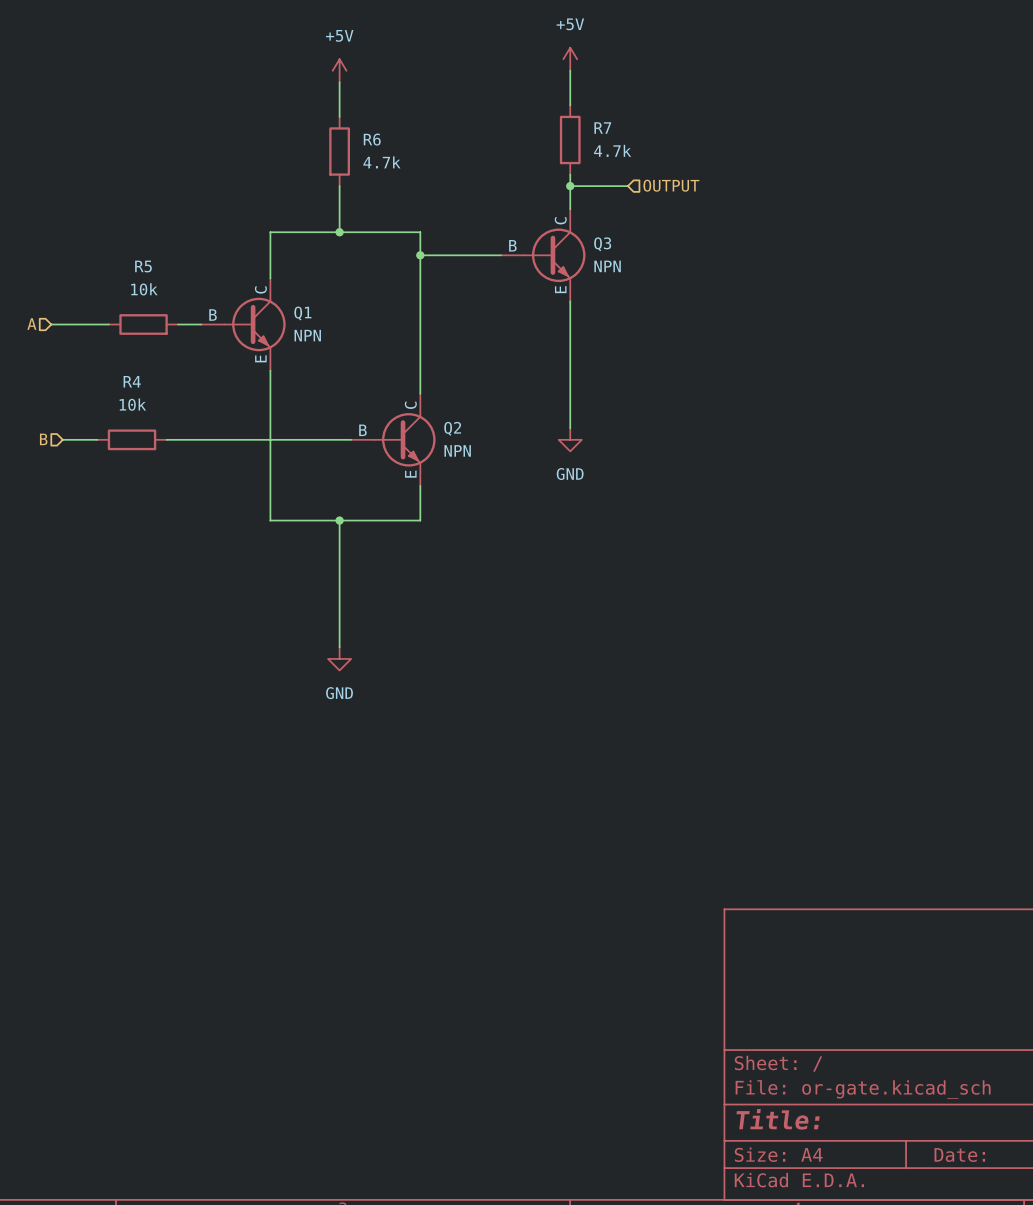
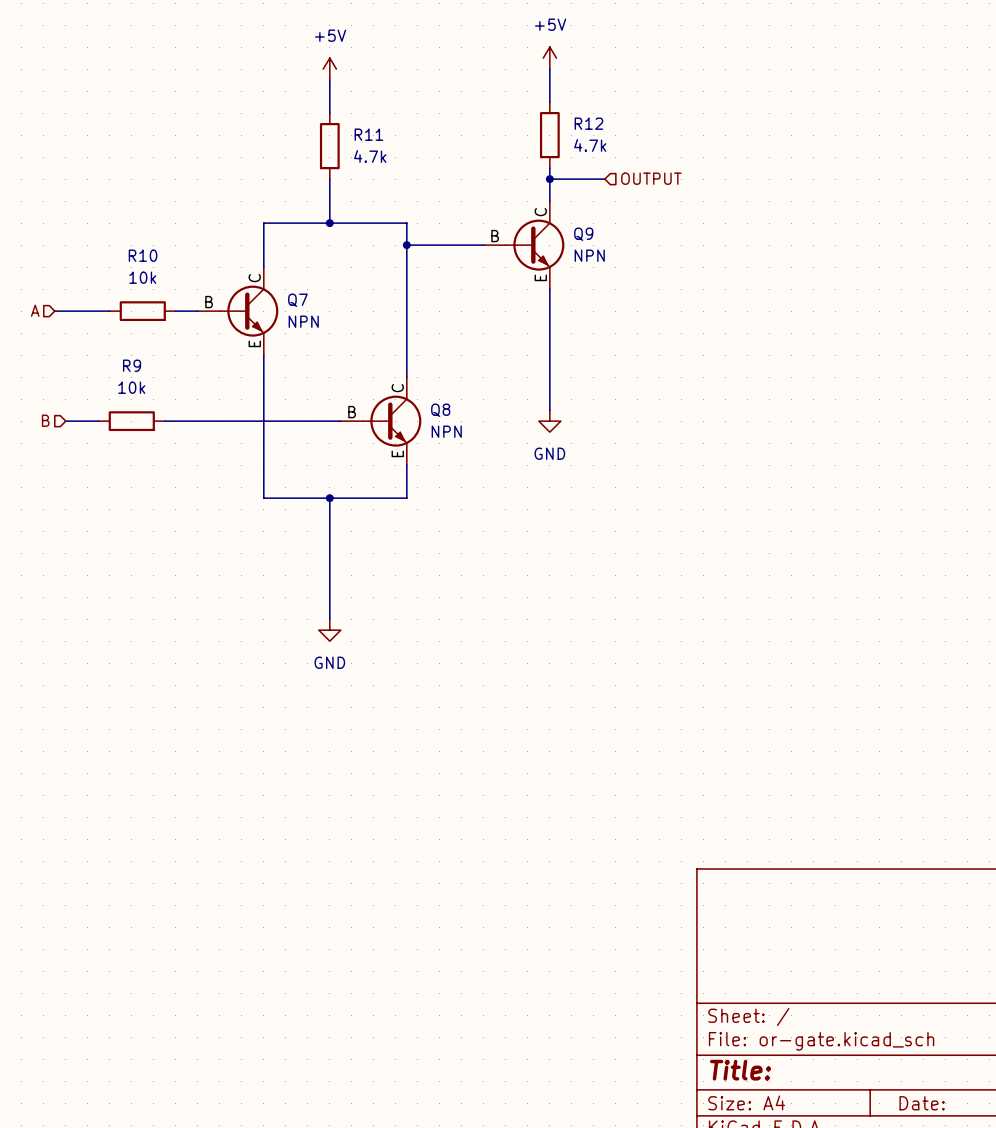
R7 name: R7 (602, 128) -> R12 (588, 123)
R6 name: R6 (372, 139) -> R11 (368, 134)
Q3 name: Q3 (602, 244) -> Q9 (583, 234)
R5 name: R5 (143, 266) -> R10 (143, 255)
Q1 name: Q1 (302, 313) -> Q7 (297, 300)
R4 name: R4 (132, 381) -> R9 (132, 365)
Q2 name: Q2 (452, 428) -> Q8 (440, 410)

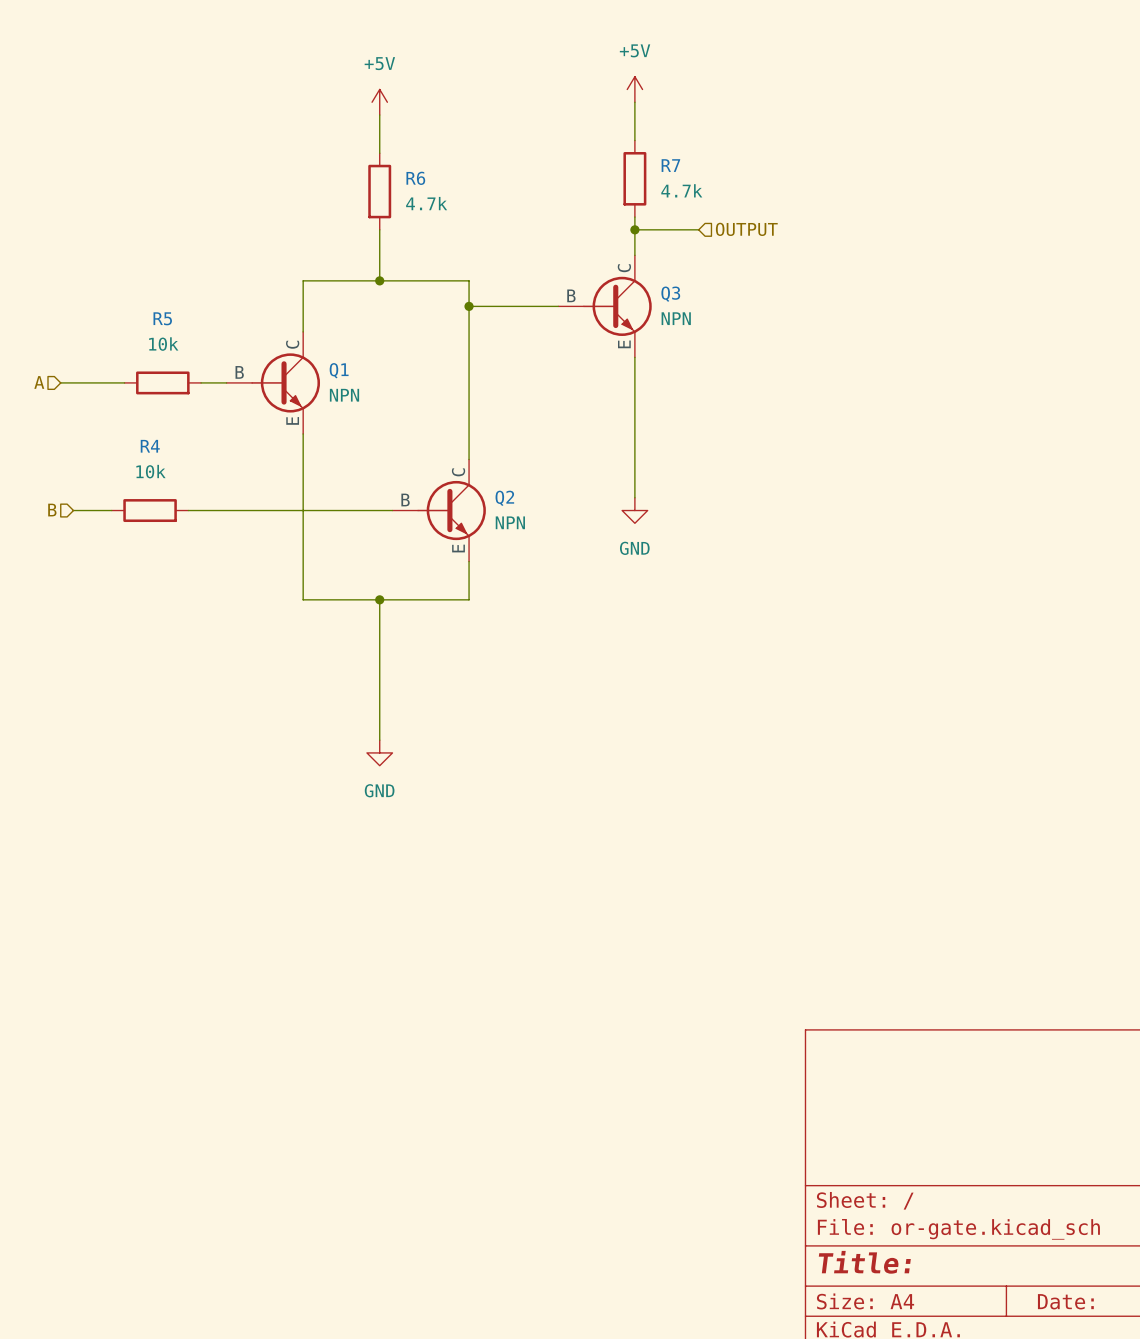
R12 name: R12 (588, 123) -> R7 (670, 165)
R11 name: R11 (368, 134) -> R6 (415, 178)
Q9 name: Q9 (583, 234) -> Q3 (670, 294)
R10 name: R10 (143, 255) -> R5 (162, 318)
Q7 name: Q7 (297, 300) -> Q1 (339, 370)
R9 name: R9 (132, 365) -> R4 (150, 446)
Q8 name: Q8 (440, 410) -> Q2 (504, 498)

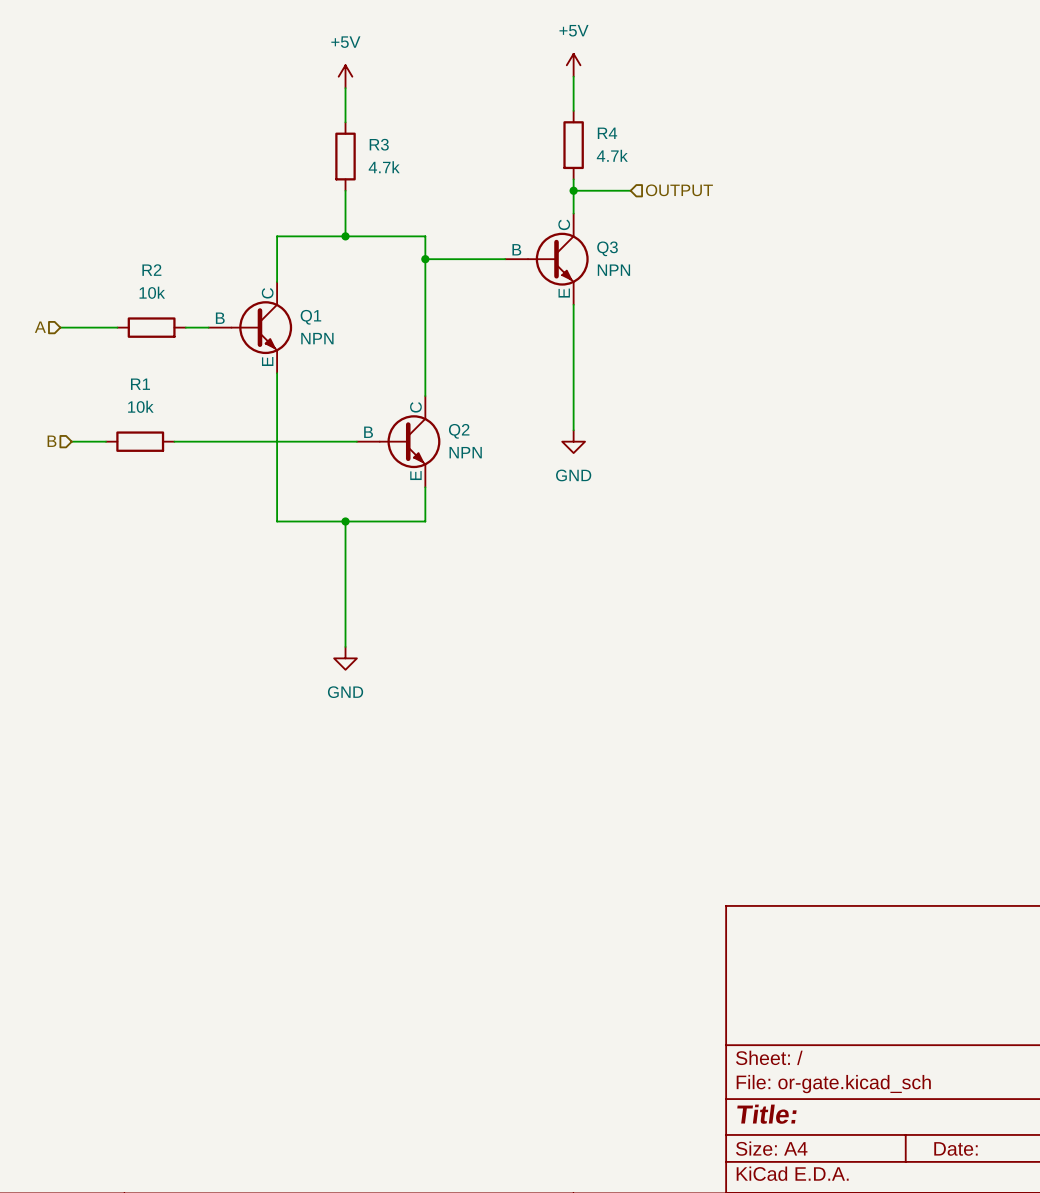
R7 name: R7 (670, 165) -> R4 (607, 133)
R6 name: R6 (415, 178) -> R3 (379, 144)
R5 name: R5 (162, 318) -> R2 (151, 270)
R4 name: R4 (150, 446) -> R1 (140, 384)

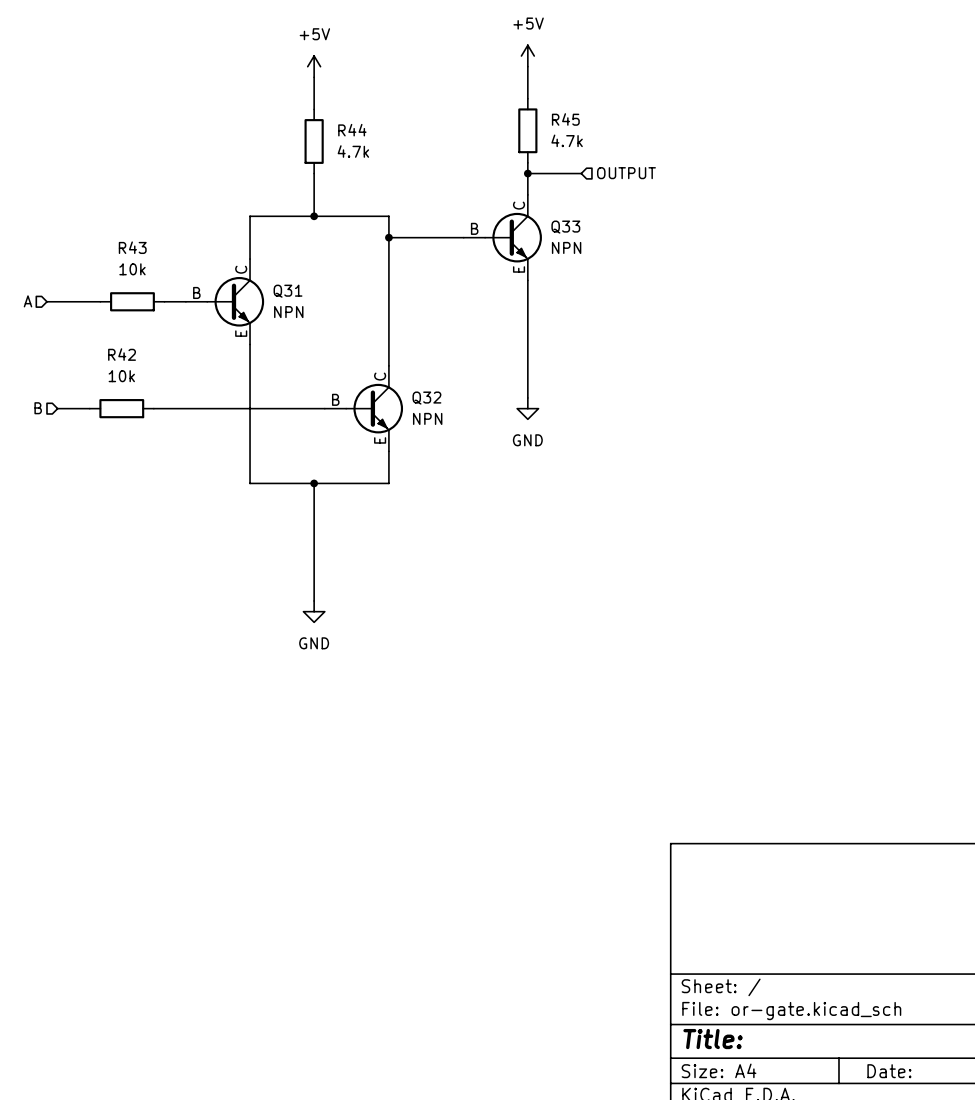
R4 name: R4 (607, 133) -> R45 (565, 119)
R3 name: R3 (379, 144) -> R44 (352, 130)
Q3 name: Q3 (607, 248) -> Q33 (565, 227)
R2 name: R2 (151, 270) -> R43 (132, 247)
Q1 name: Q1 (310, 317) -> Q31 (288, 291)
R1 name: R1 (140, 384) -> R42 (122, 354)
Q2 name: Q2 (459, 431) -> Q32 (426, 398)

